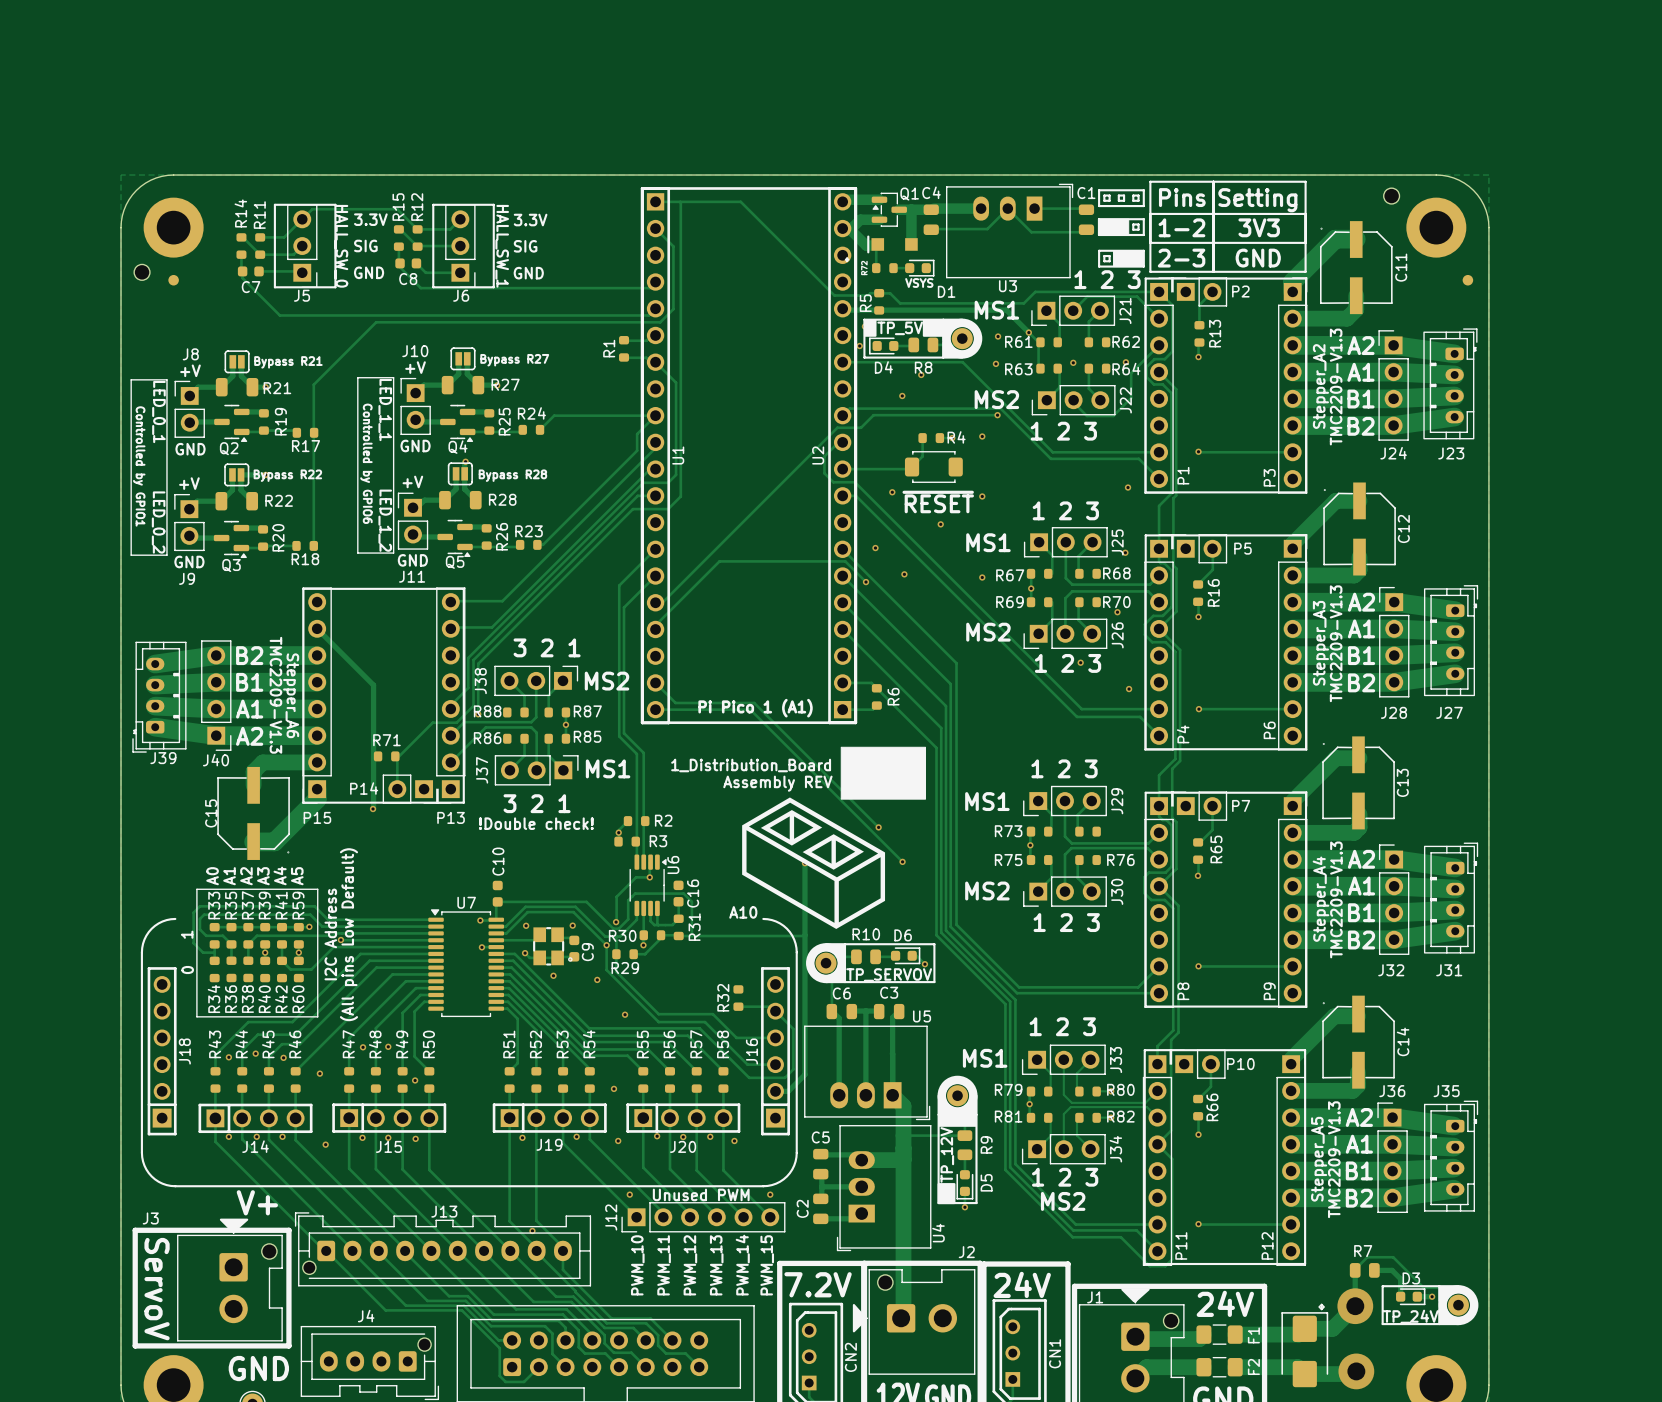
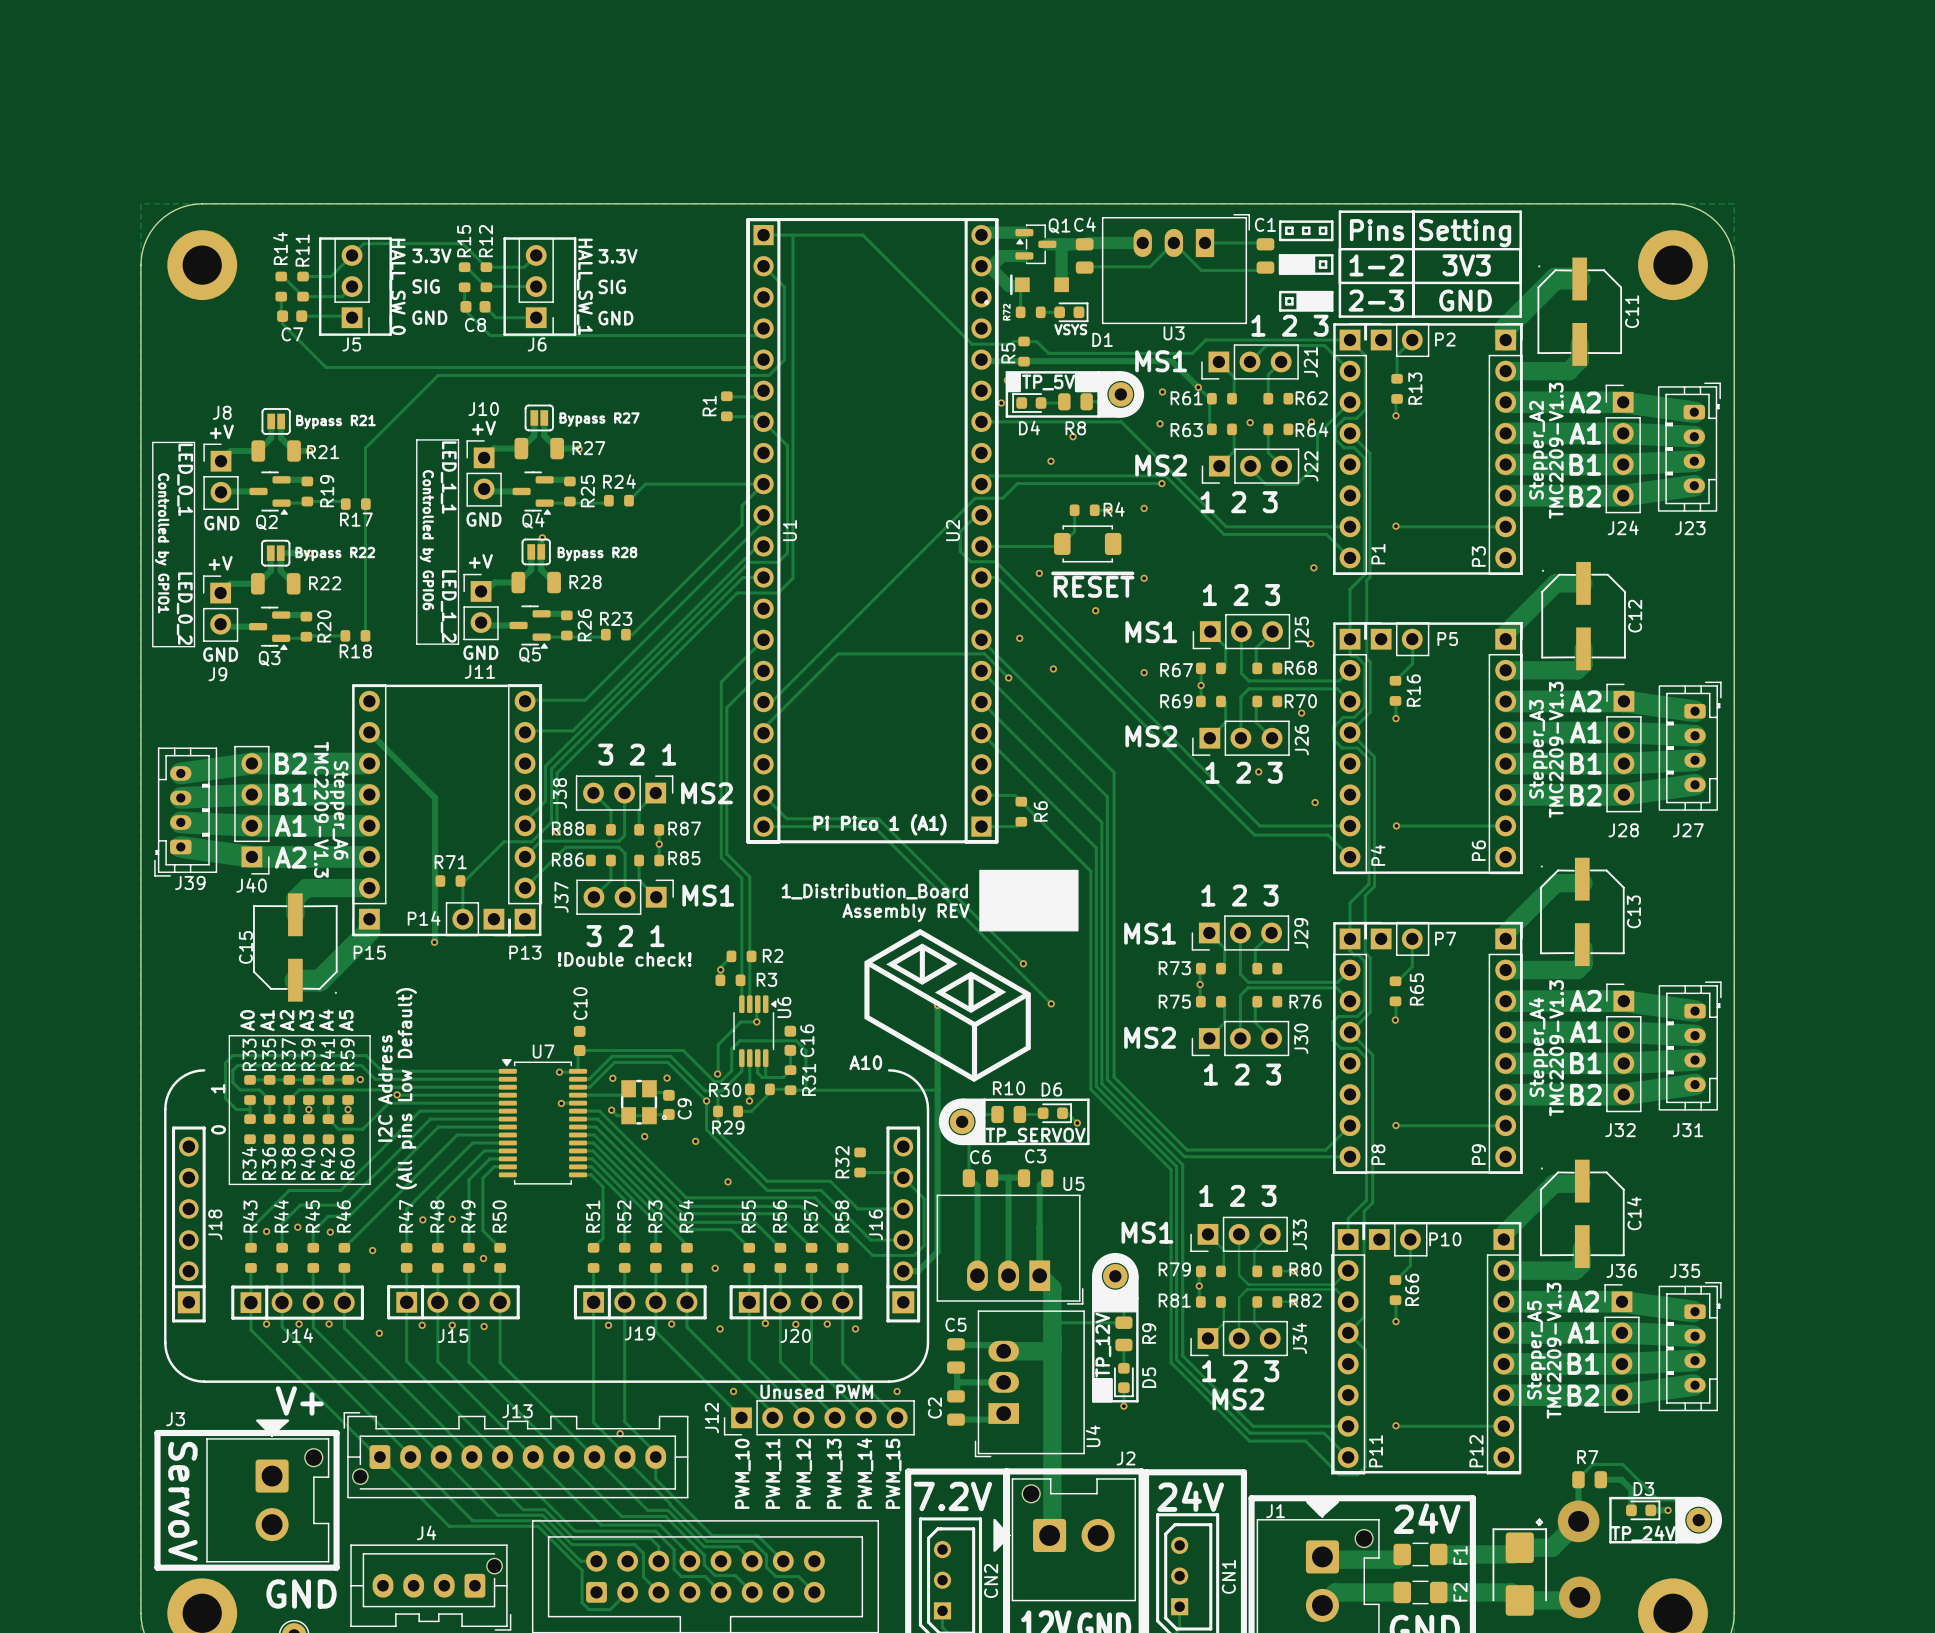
part: (1391, 196) -> none
part: (142, 272) -> none
part: (173, 280) -> none
part: (1467, 280) -> none

